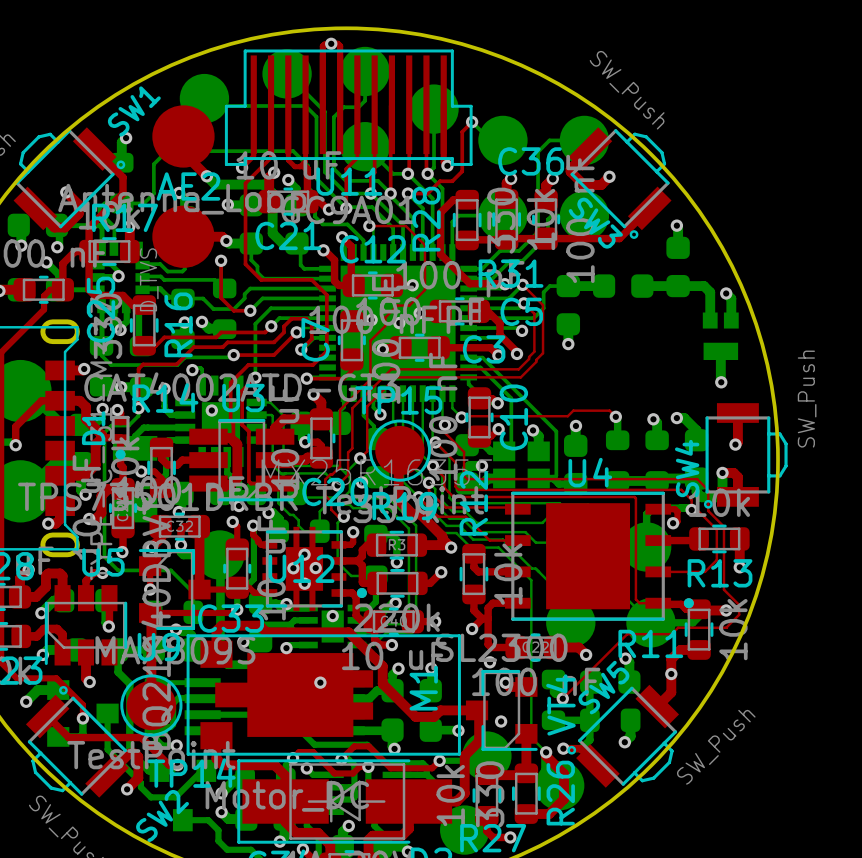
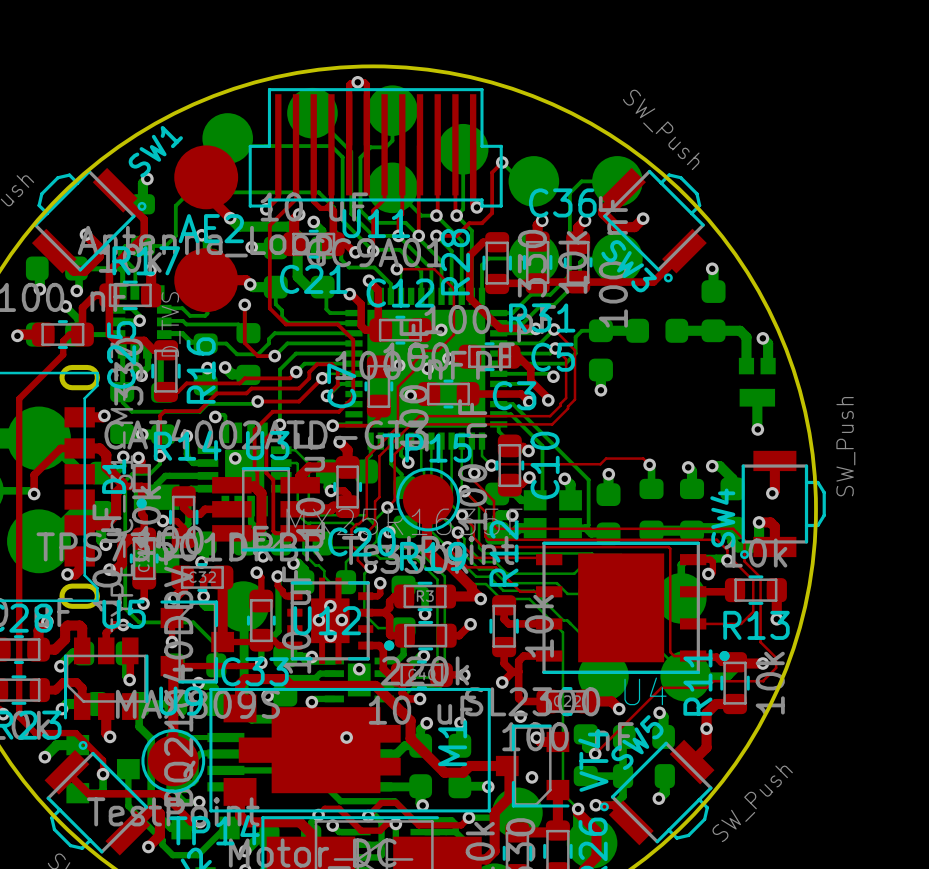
U4 name position: U4 (590, 472) -> U4 (645, 691)
R11 name rotation: 0° (650, 643) -> 90° counterclockwise (697, 682)

